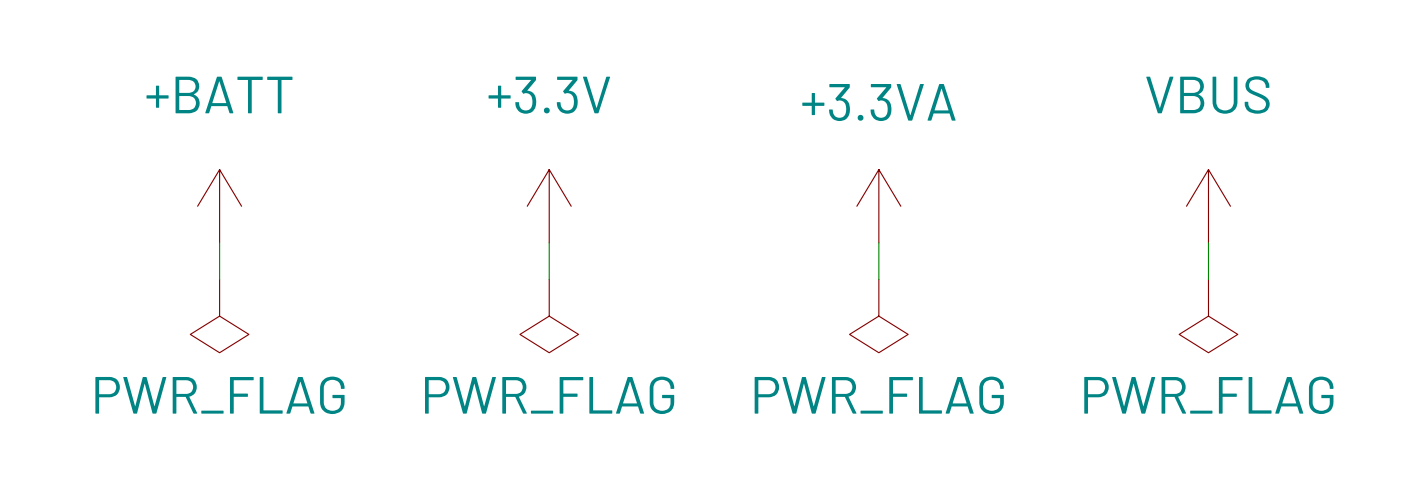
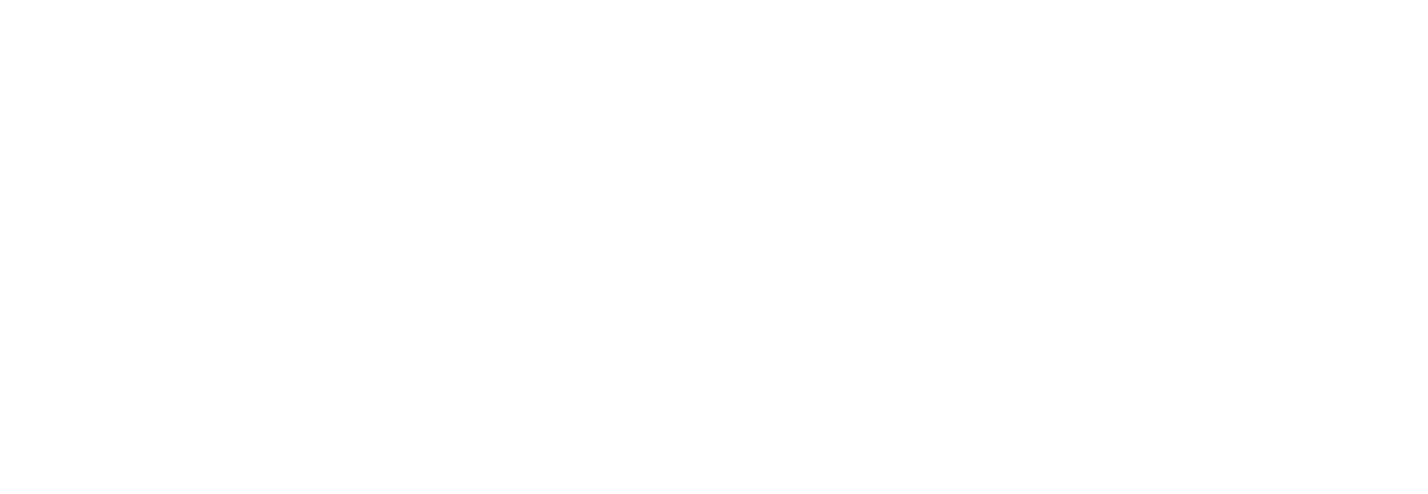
power symbol: +BATT (219, 206) -> none
power symbol: +3.3V (549, 206) -> none
power symbol: +3.3VA (878, 206) -> none
power symbol: VBUS (1208, 206) -> none
wire: (219, 242) (219, 279) -> none
wire: (549, 242) (549, 279) -> none
wire: (878, 242) (878, 279) -> none
wire: (1208, 242) (1208, 279) -> none
power symbol: PWR_FLAG (219, 316) -> none
power symbol: PWR_FLAG (549, 316) -> none
power symbol: PWR_FLAG (878, 316) -> none
power symbol: PWR_FLAG (1208, 316) -> none

